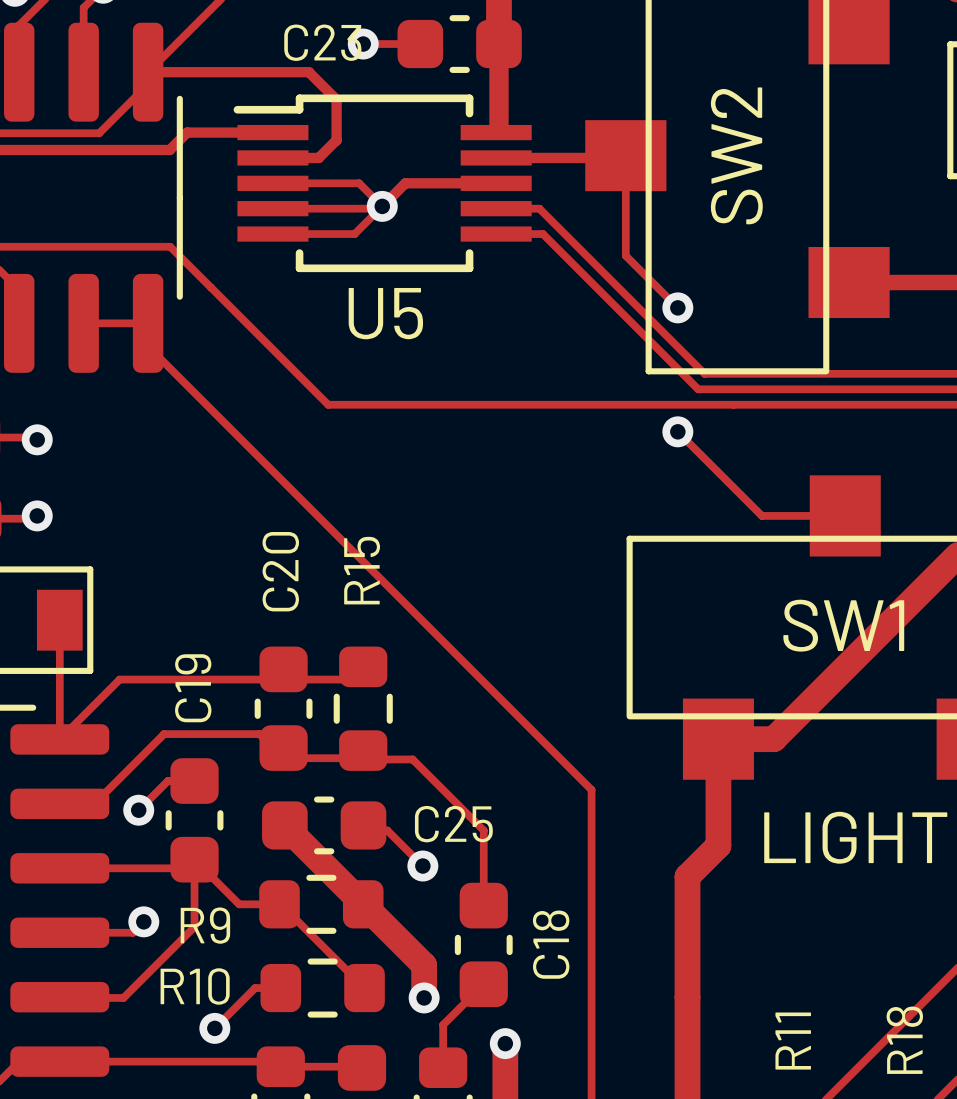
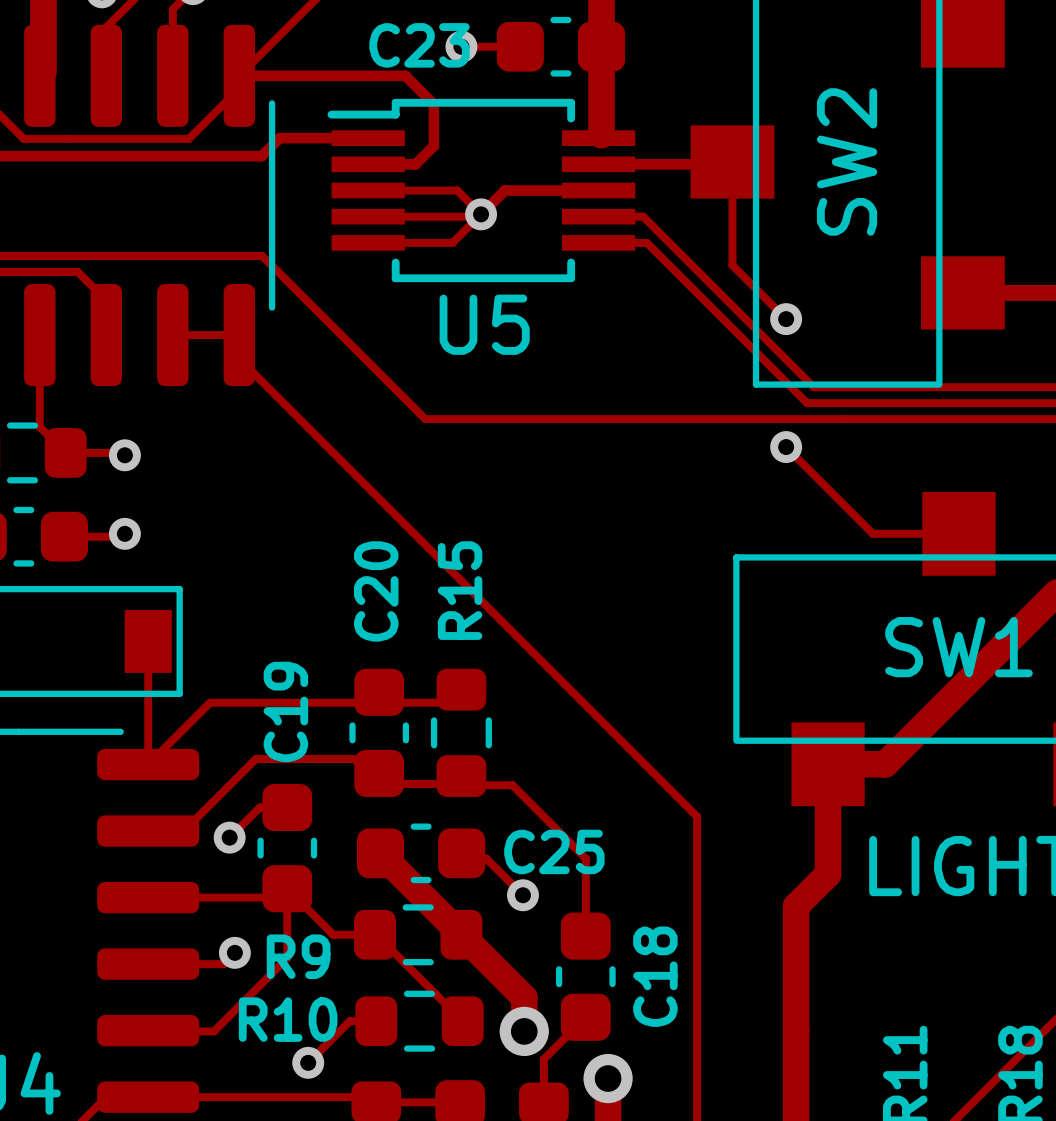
track width: thin (498, 44) (498, 129) -> thick (601, 46) (601, 135)
via size: [408, 982, 440, 1014] -> [499, 1006, 549, 1057]
via size: [489, 1028, 521, 1060] -> [583, 1053, 633, 1104]

